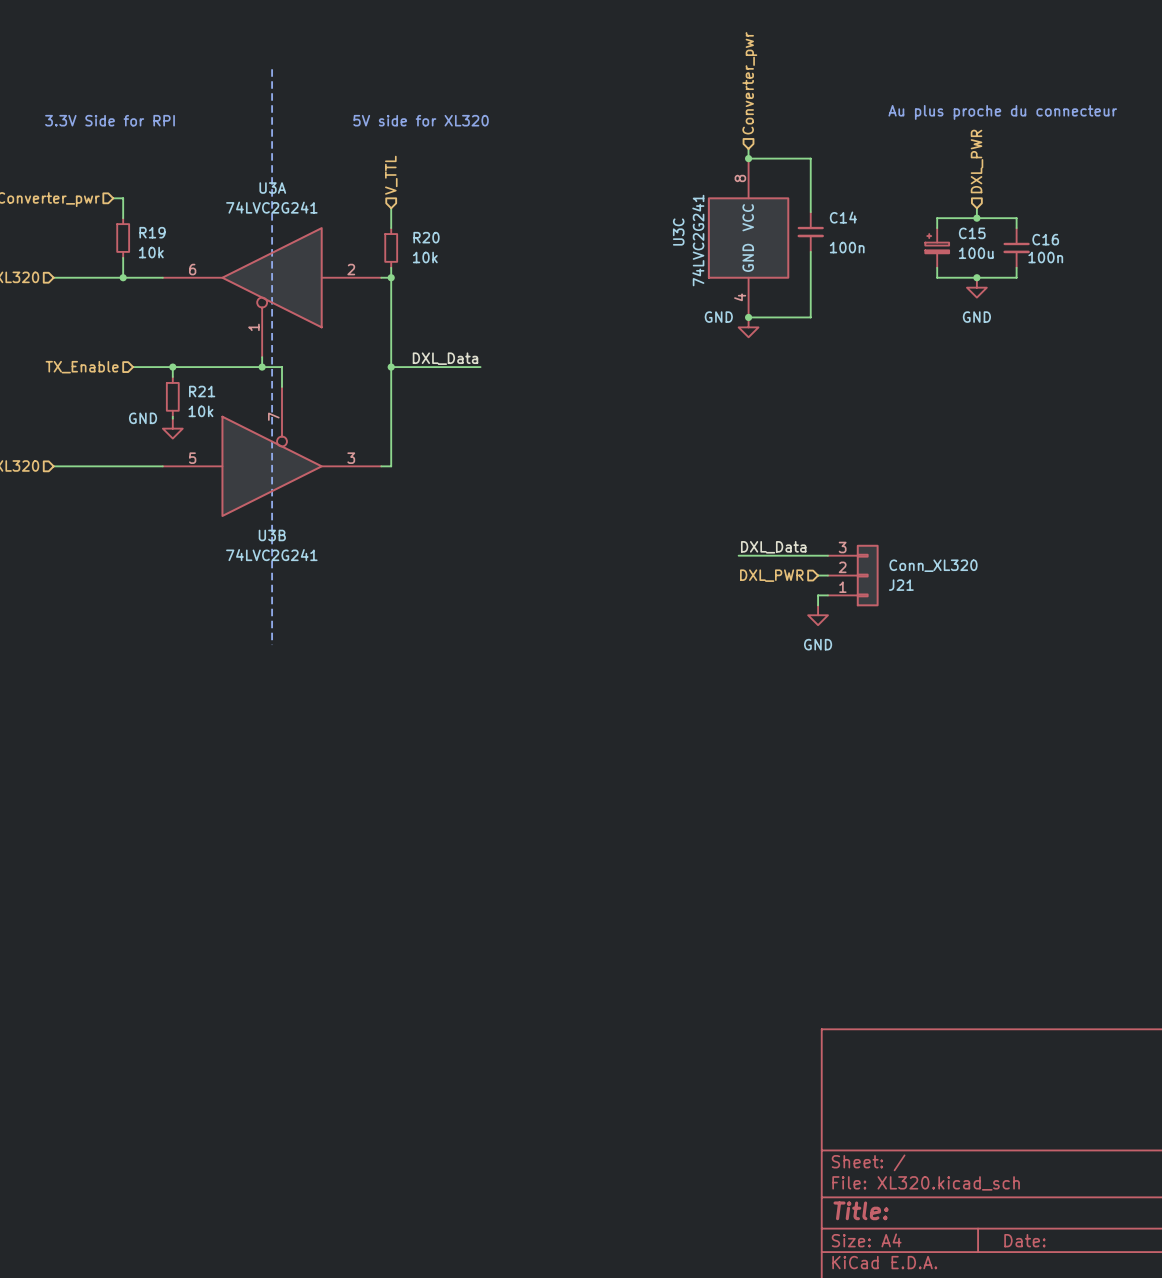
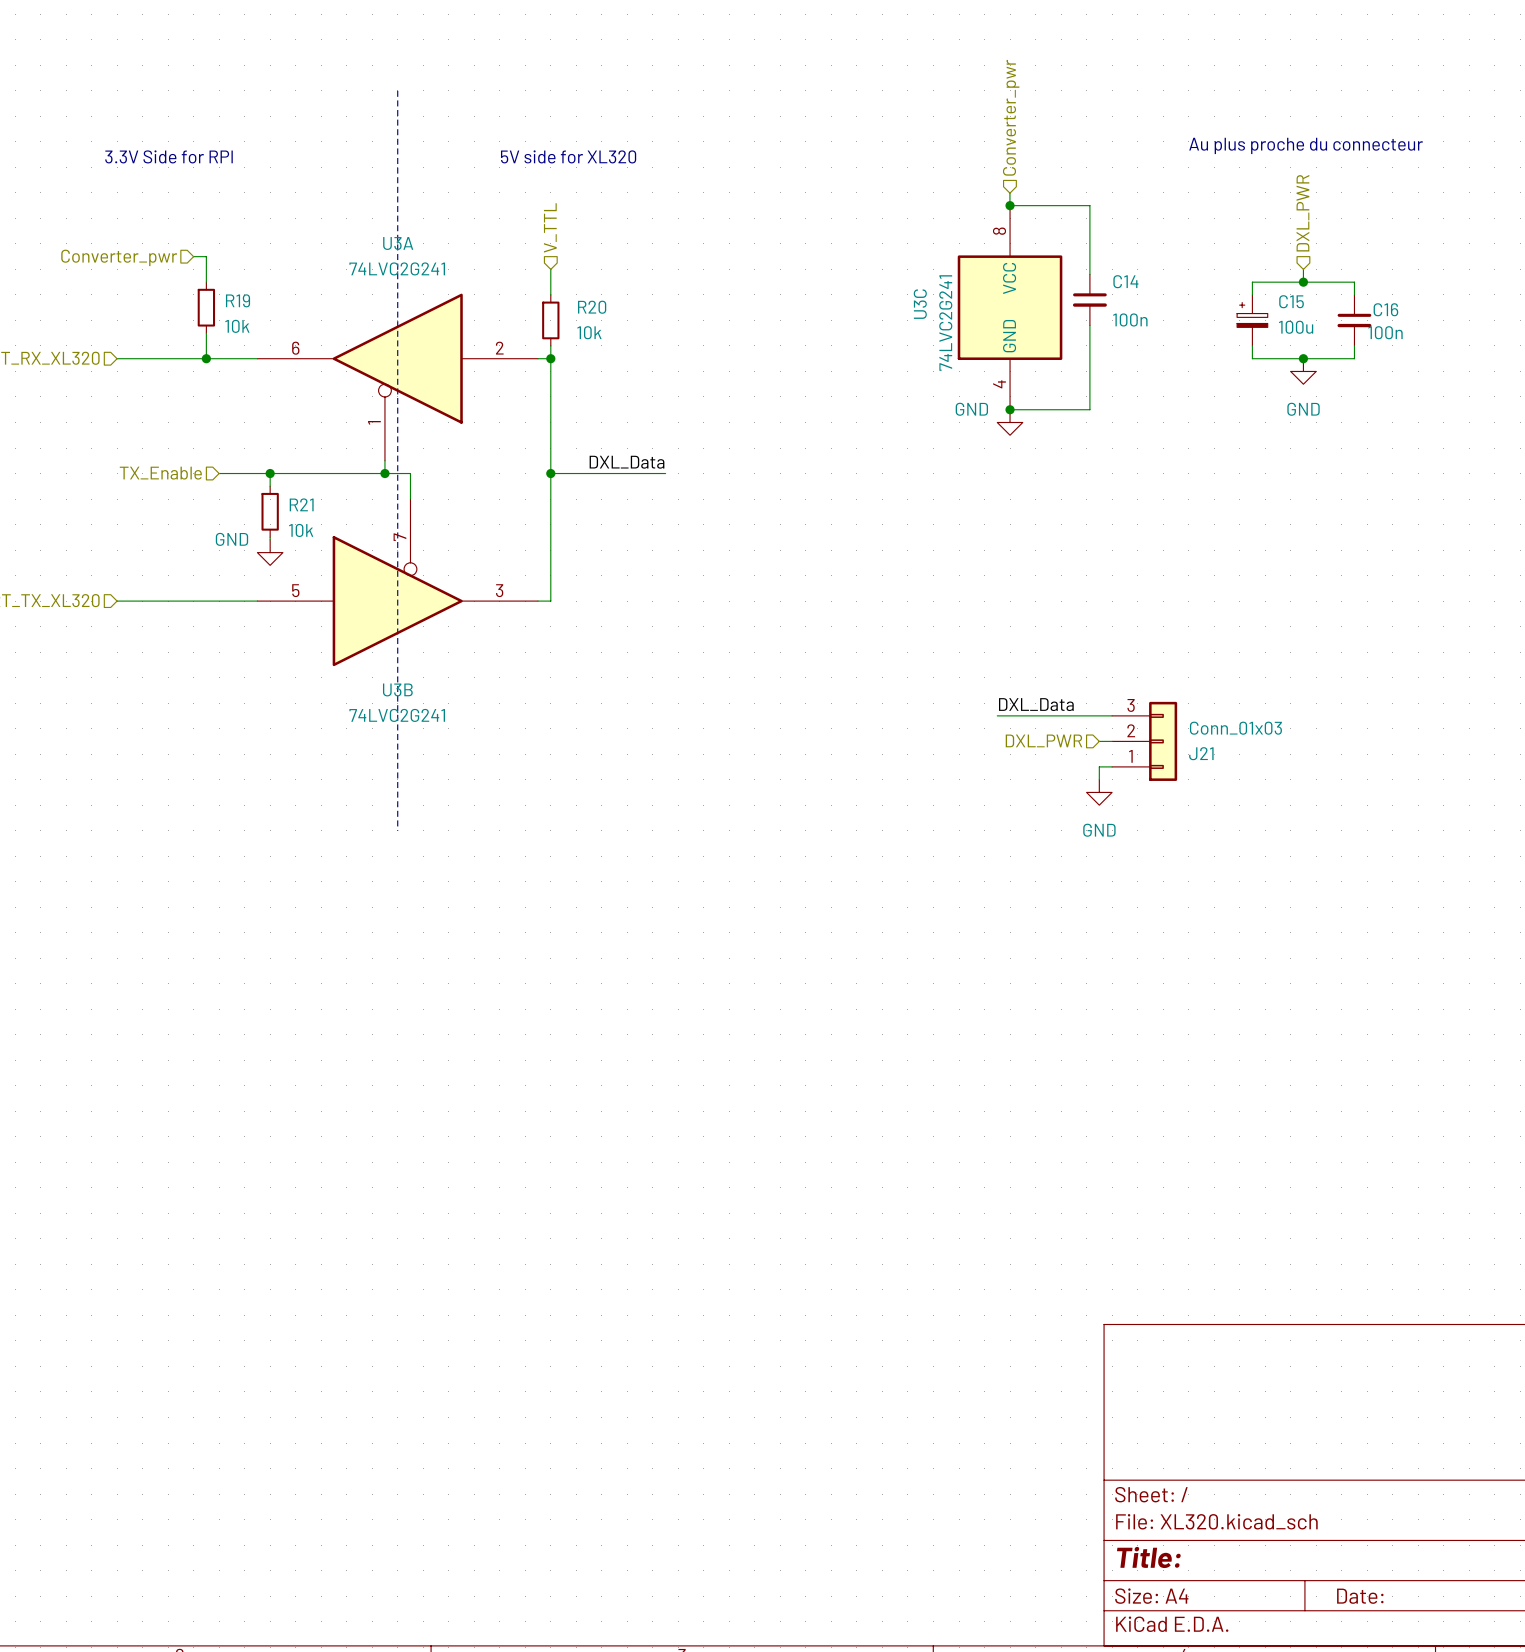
J21 value: Conn_XL320 (933, 565) -> Conn_01x03 (1235, 728)

